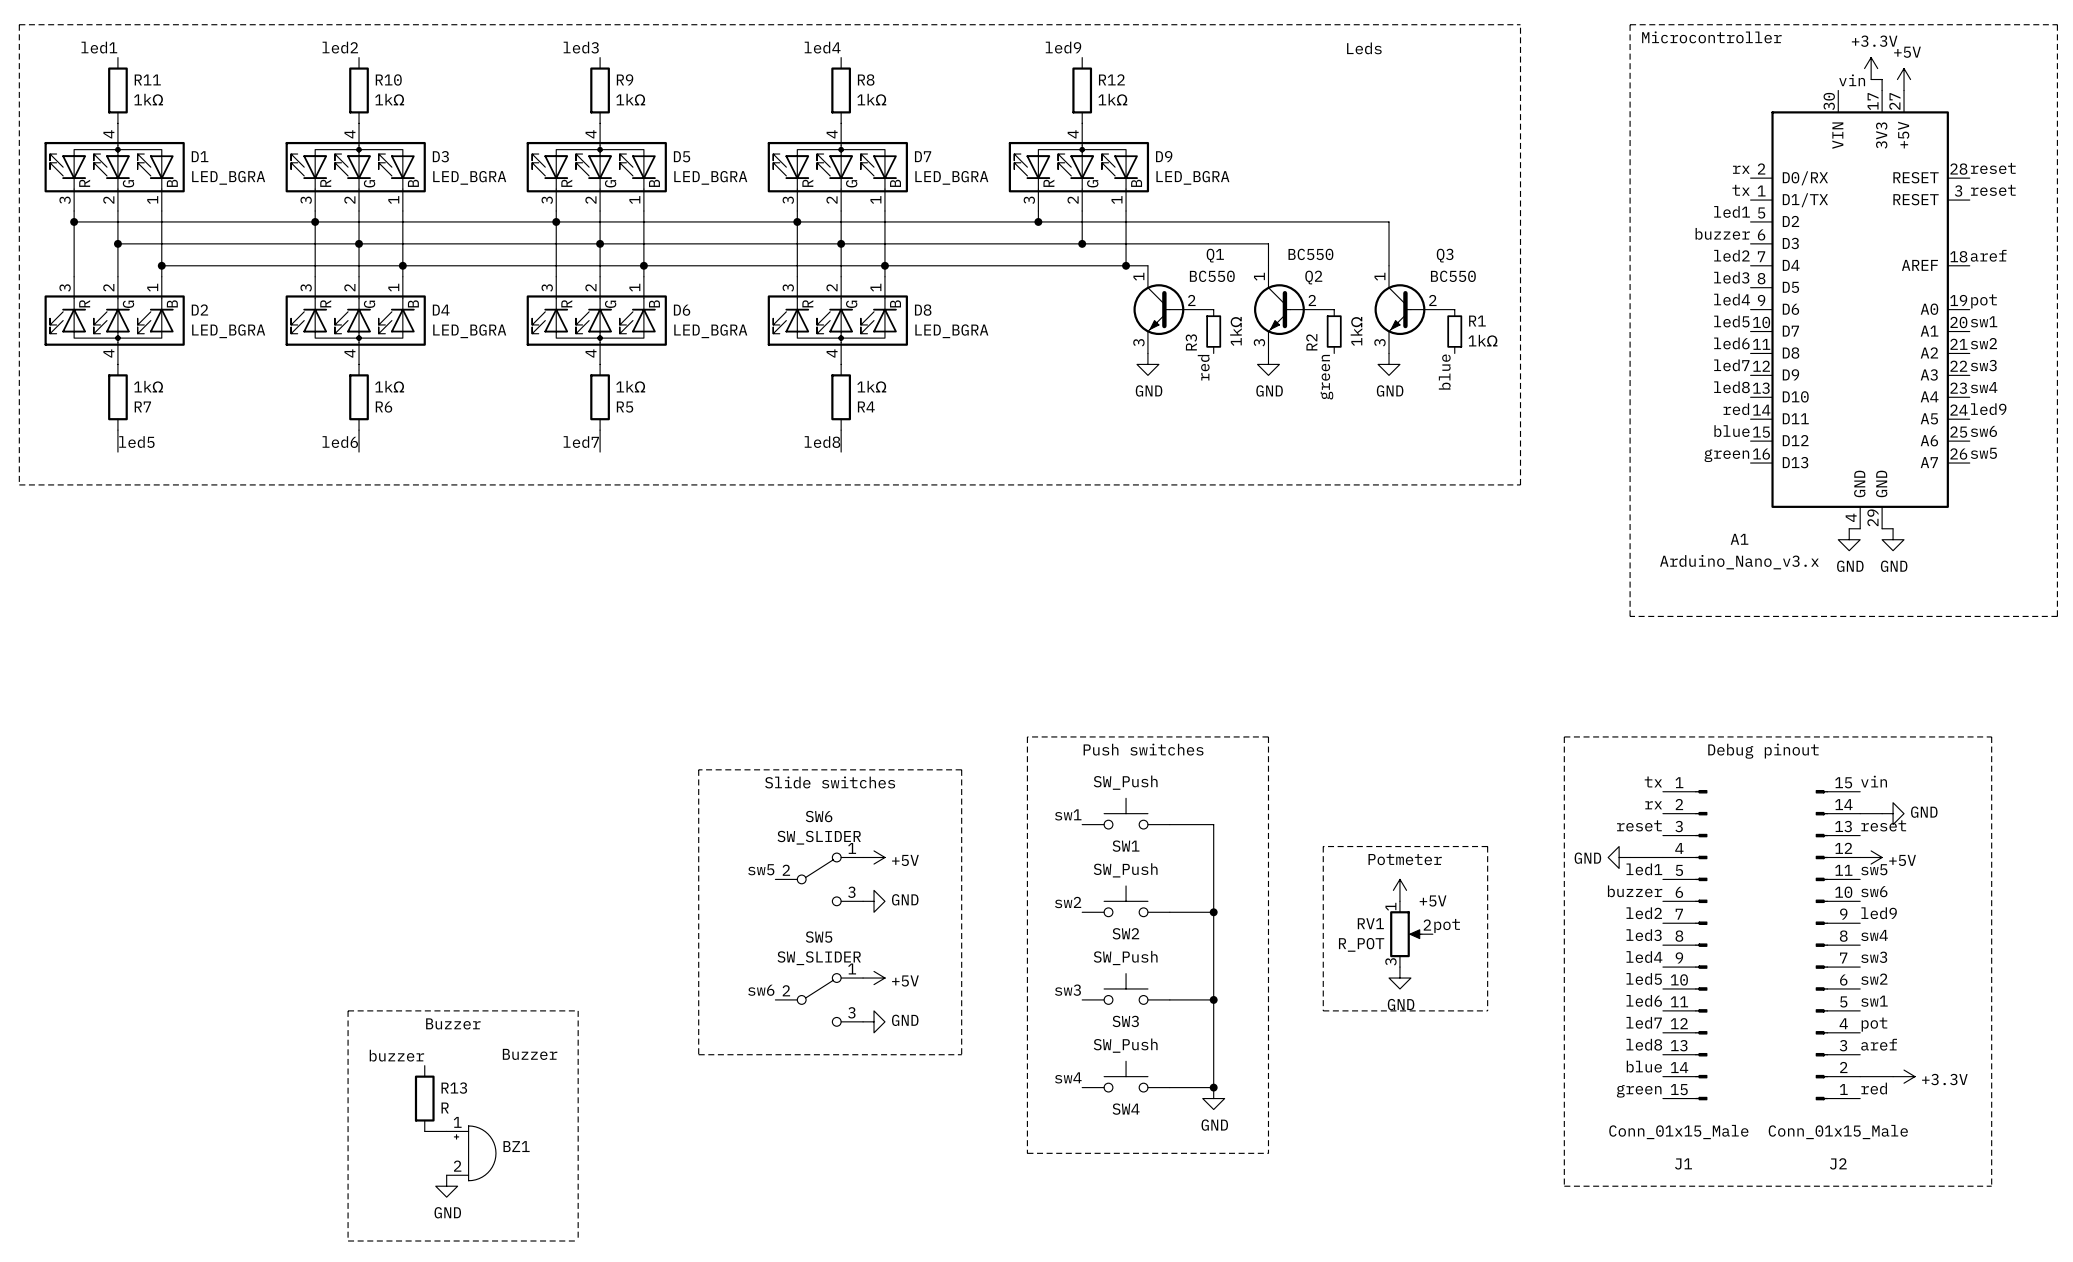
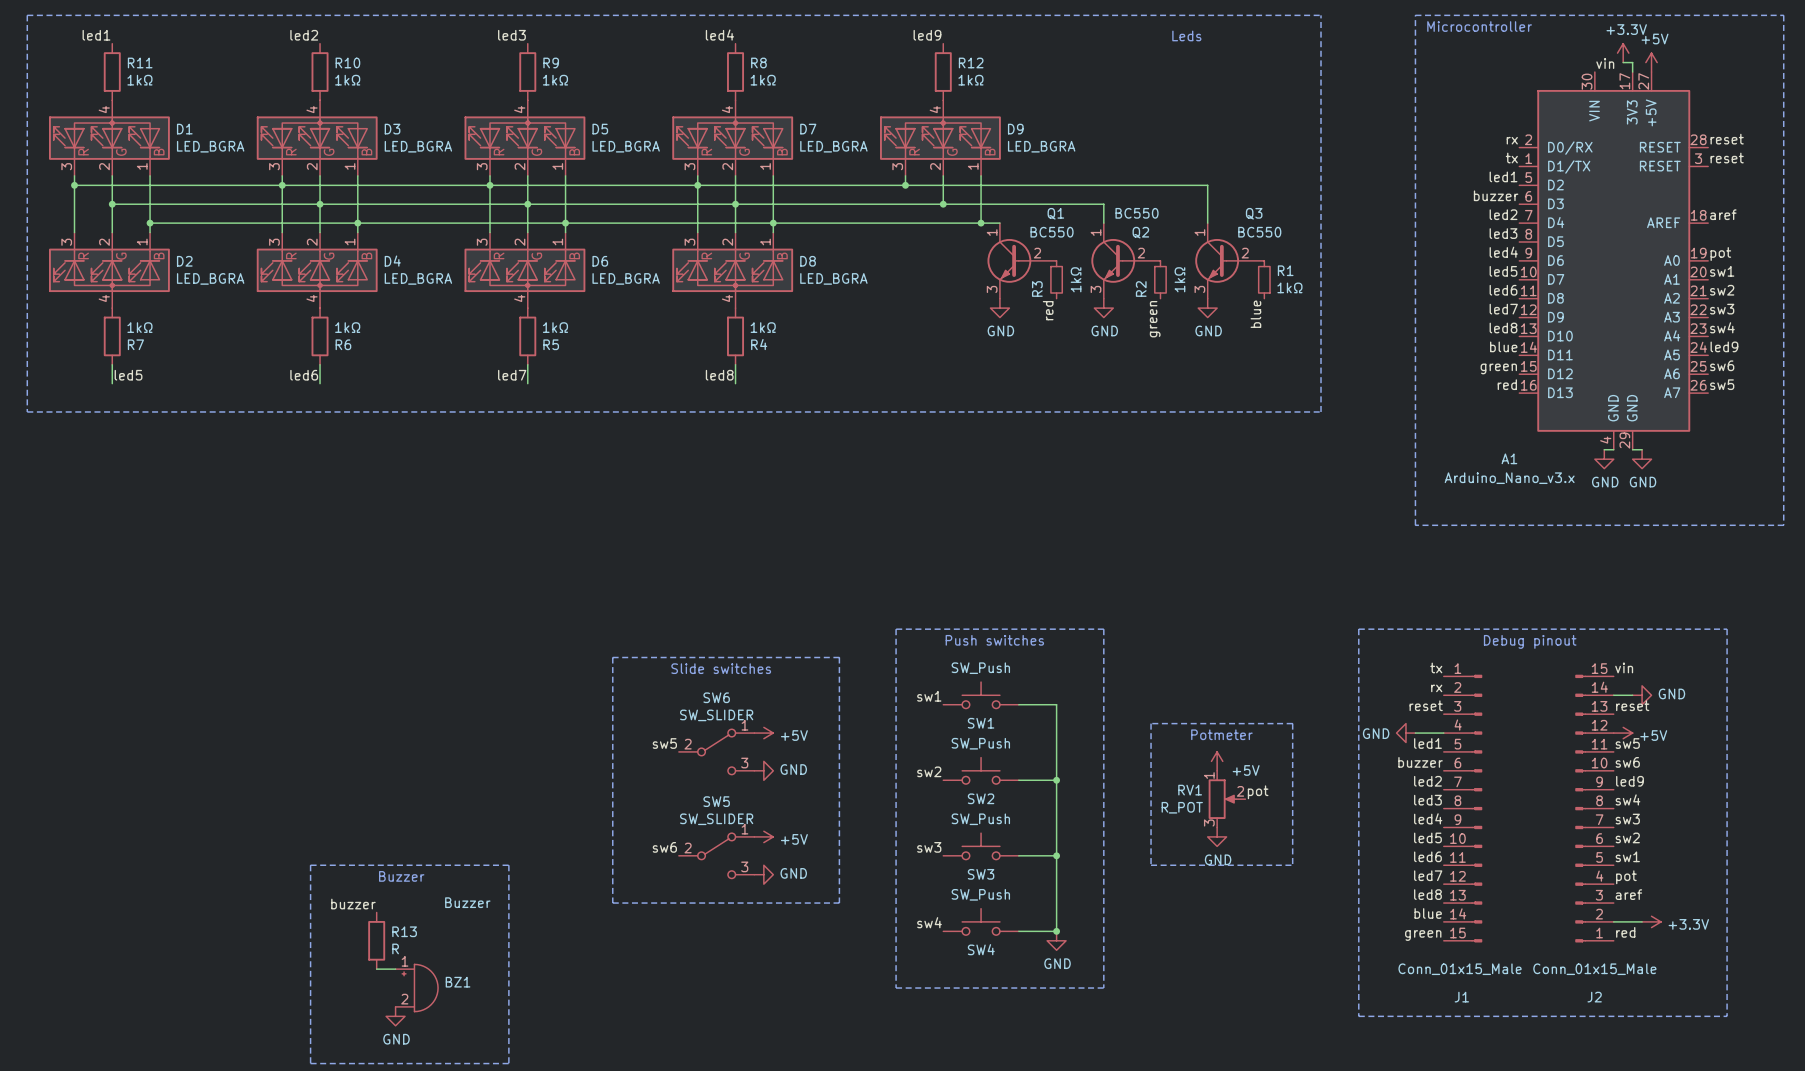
label: red (1736, 409) -> blue (1503, 346)
label: blue (1731, 431) -> green (1498, 368)
label: green (1726, 455) -> red (1507, 384)

